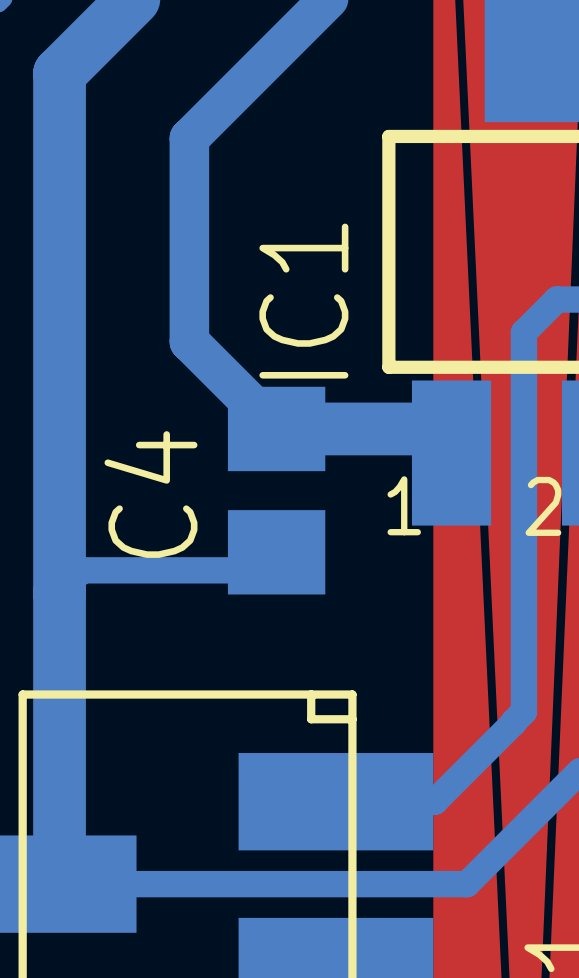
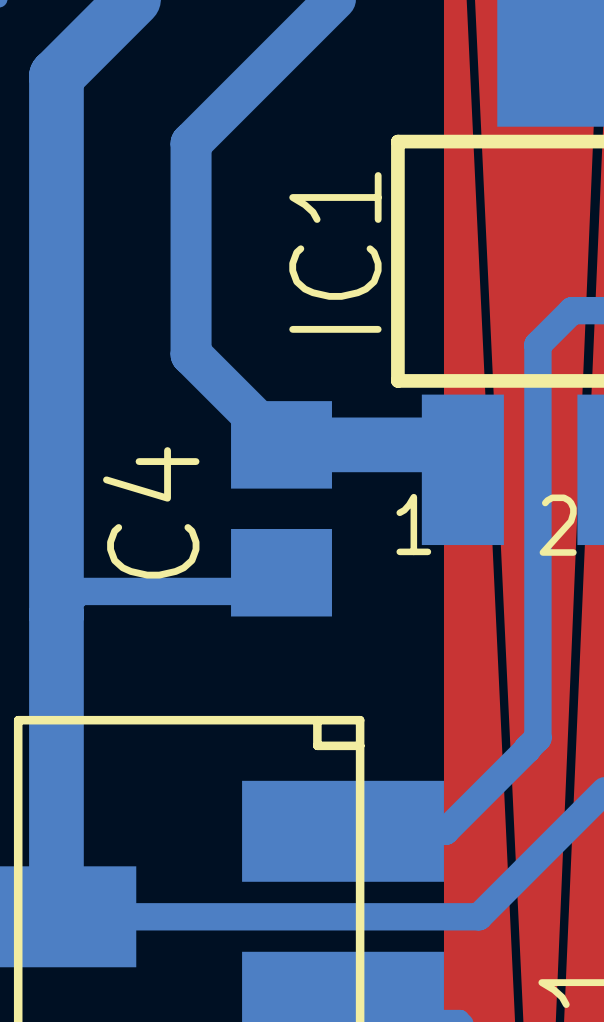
IC1 name position: IC1 (303, 301) -> IC1 (335, 252)

